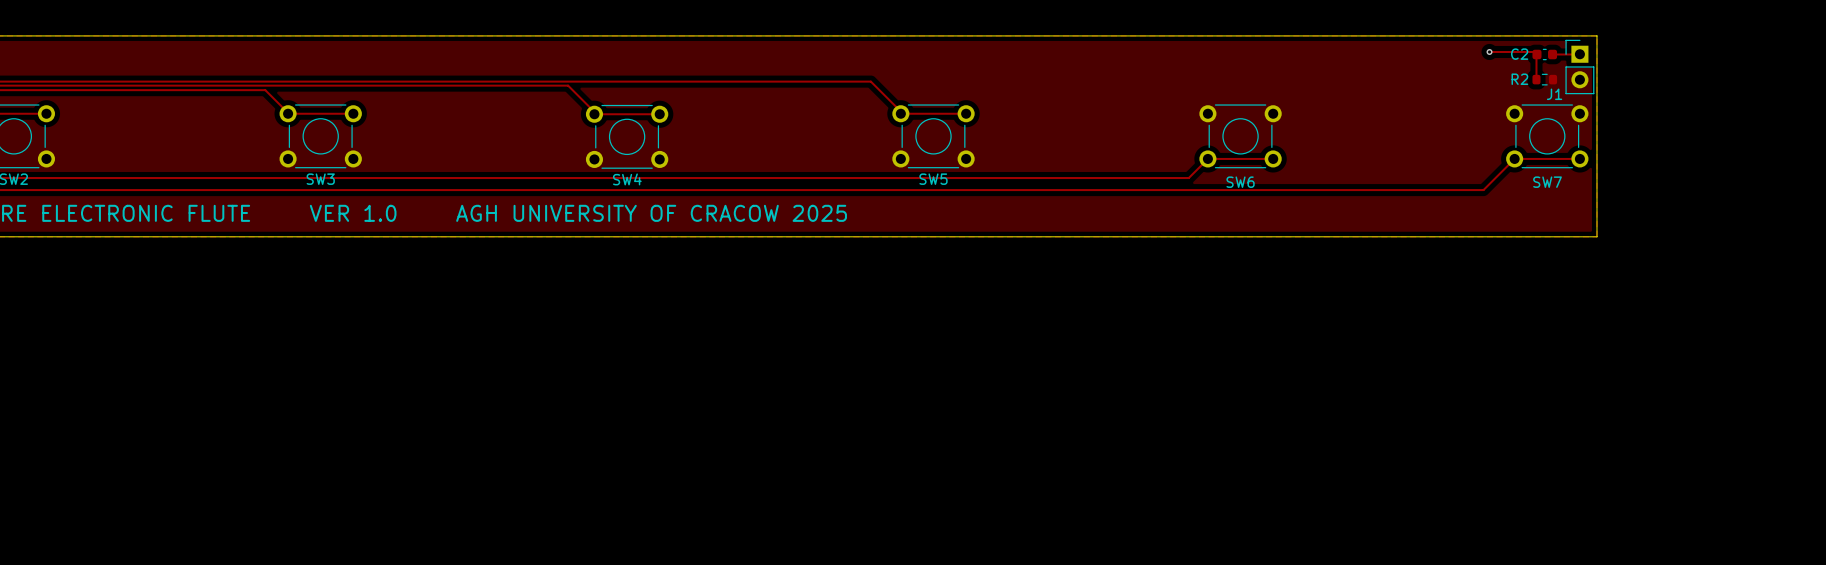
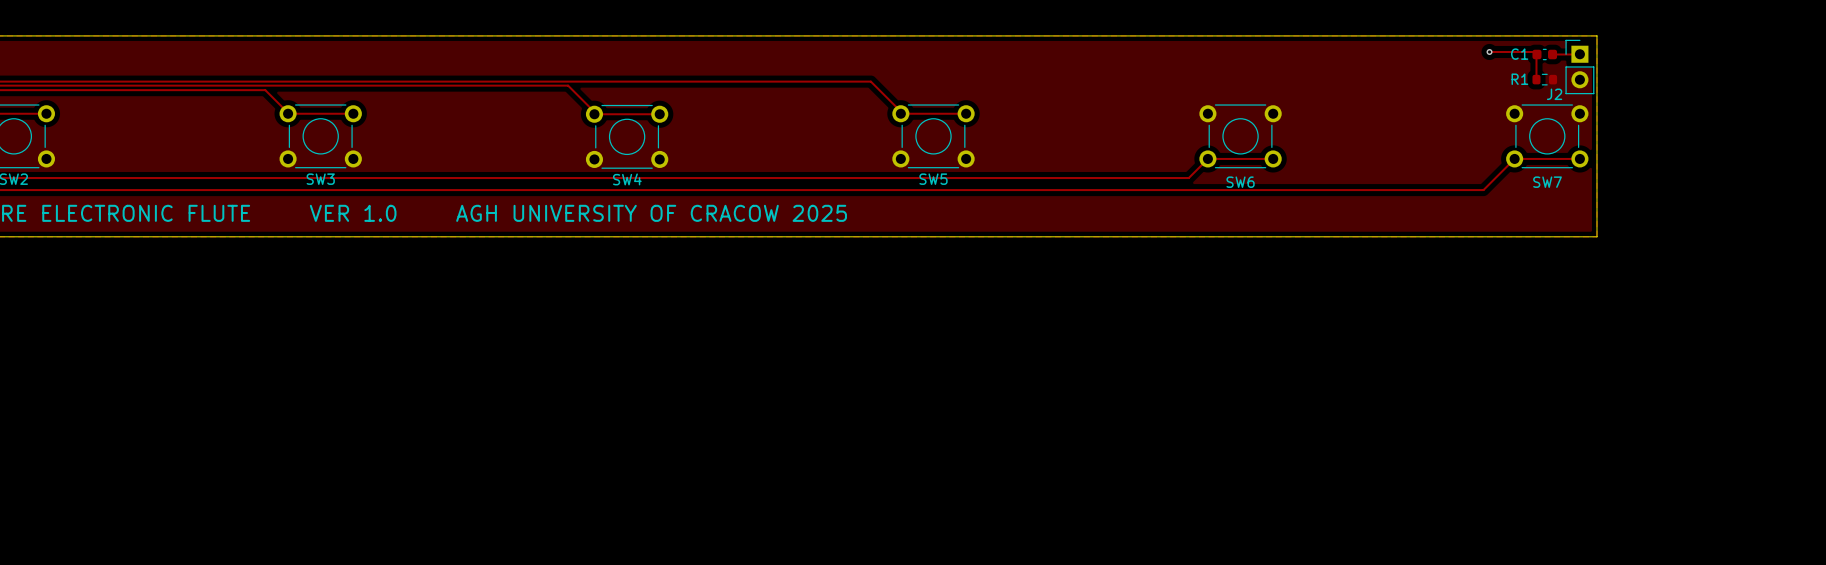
C2 name: C2 (1519, 54) -> C1 (1519, 54)
R2 name: R2 (1519, 79) -> R1 (1519, 79)
J1 name: J1 (1554, 94) -> J2 (1554, 94)

